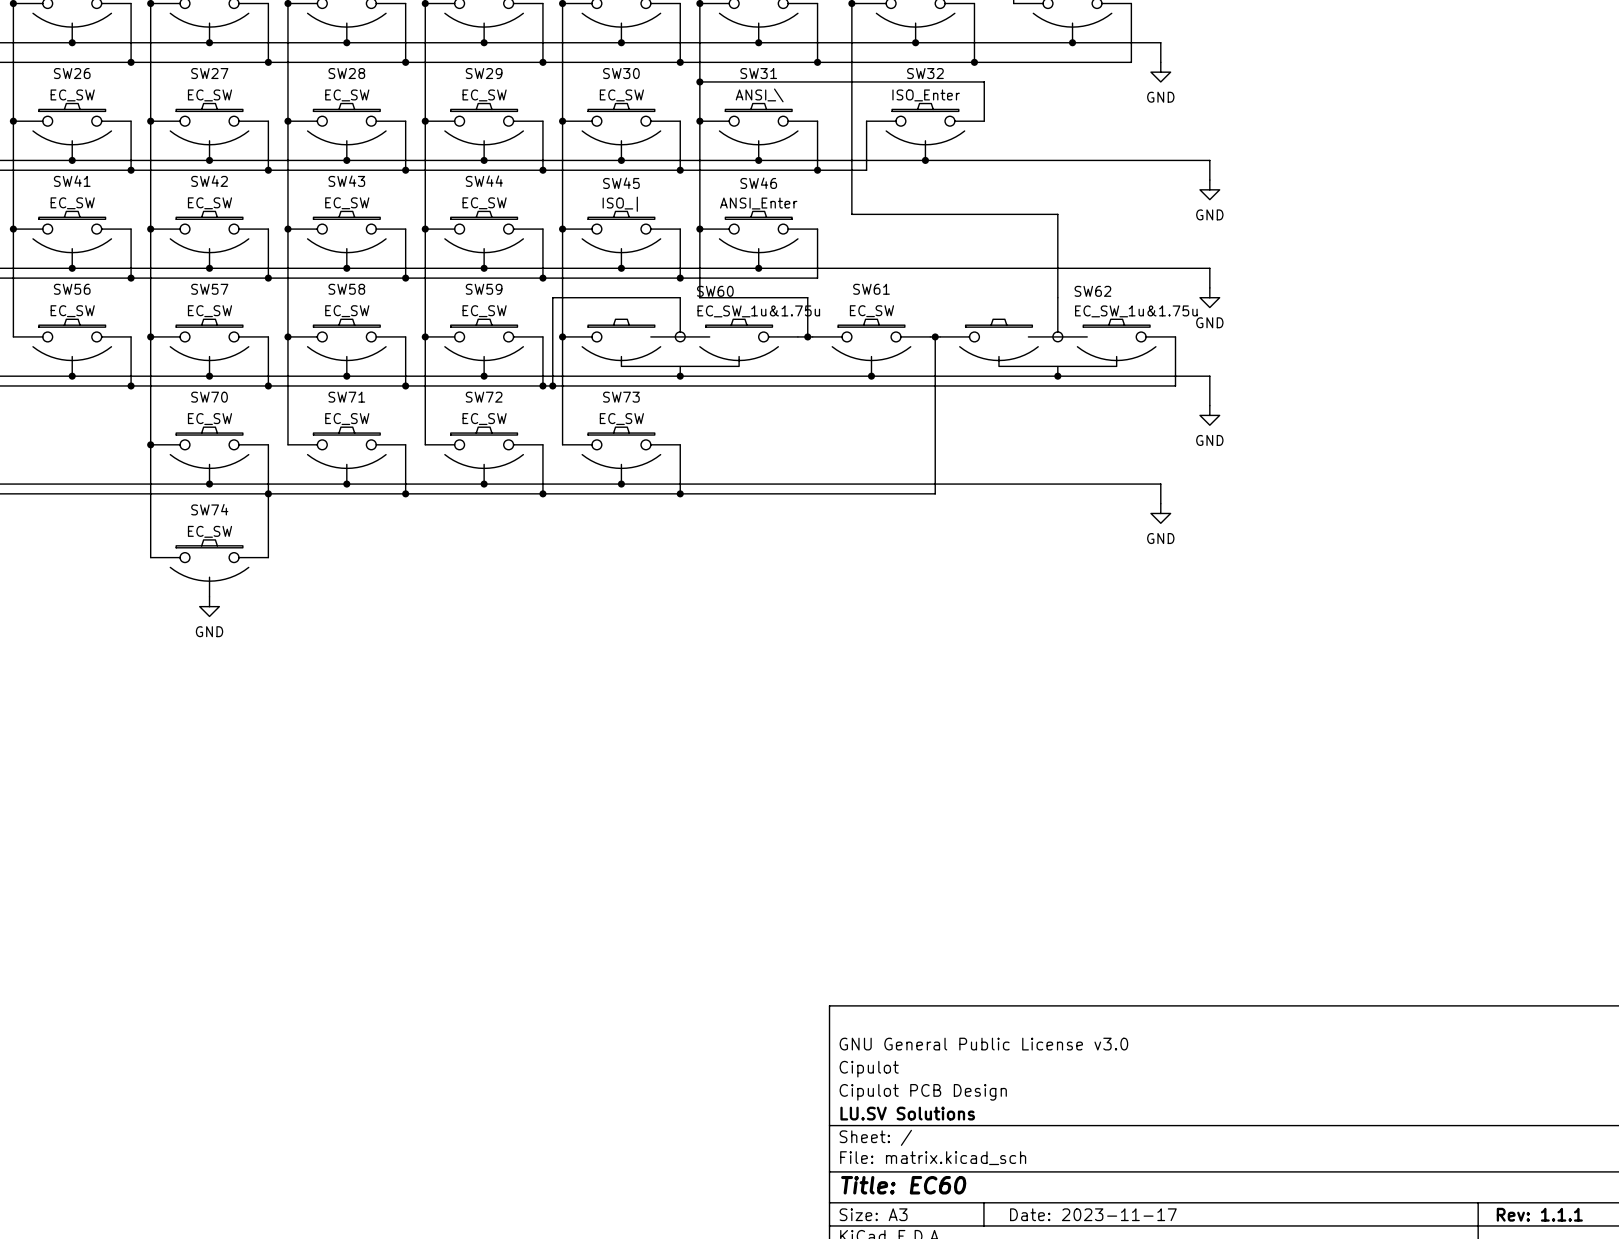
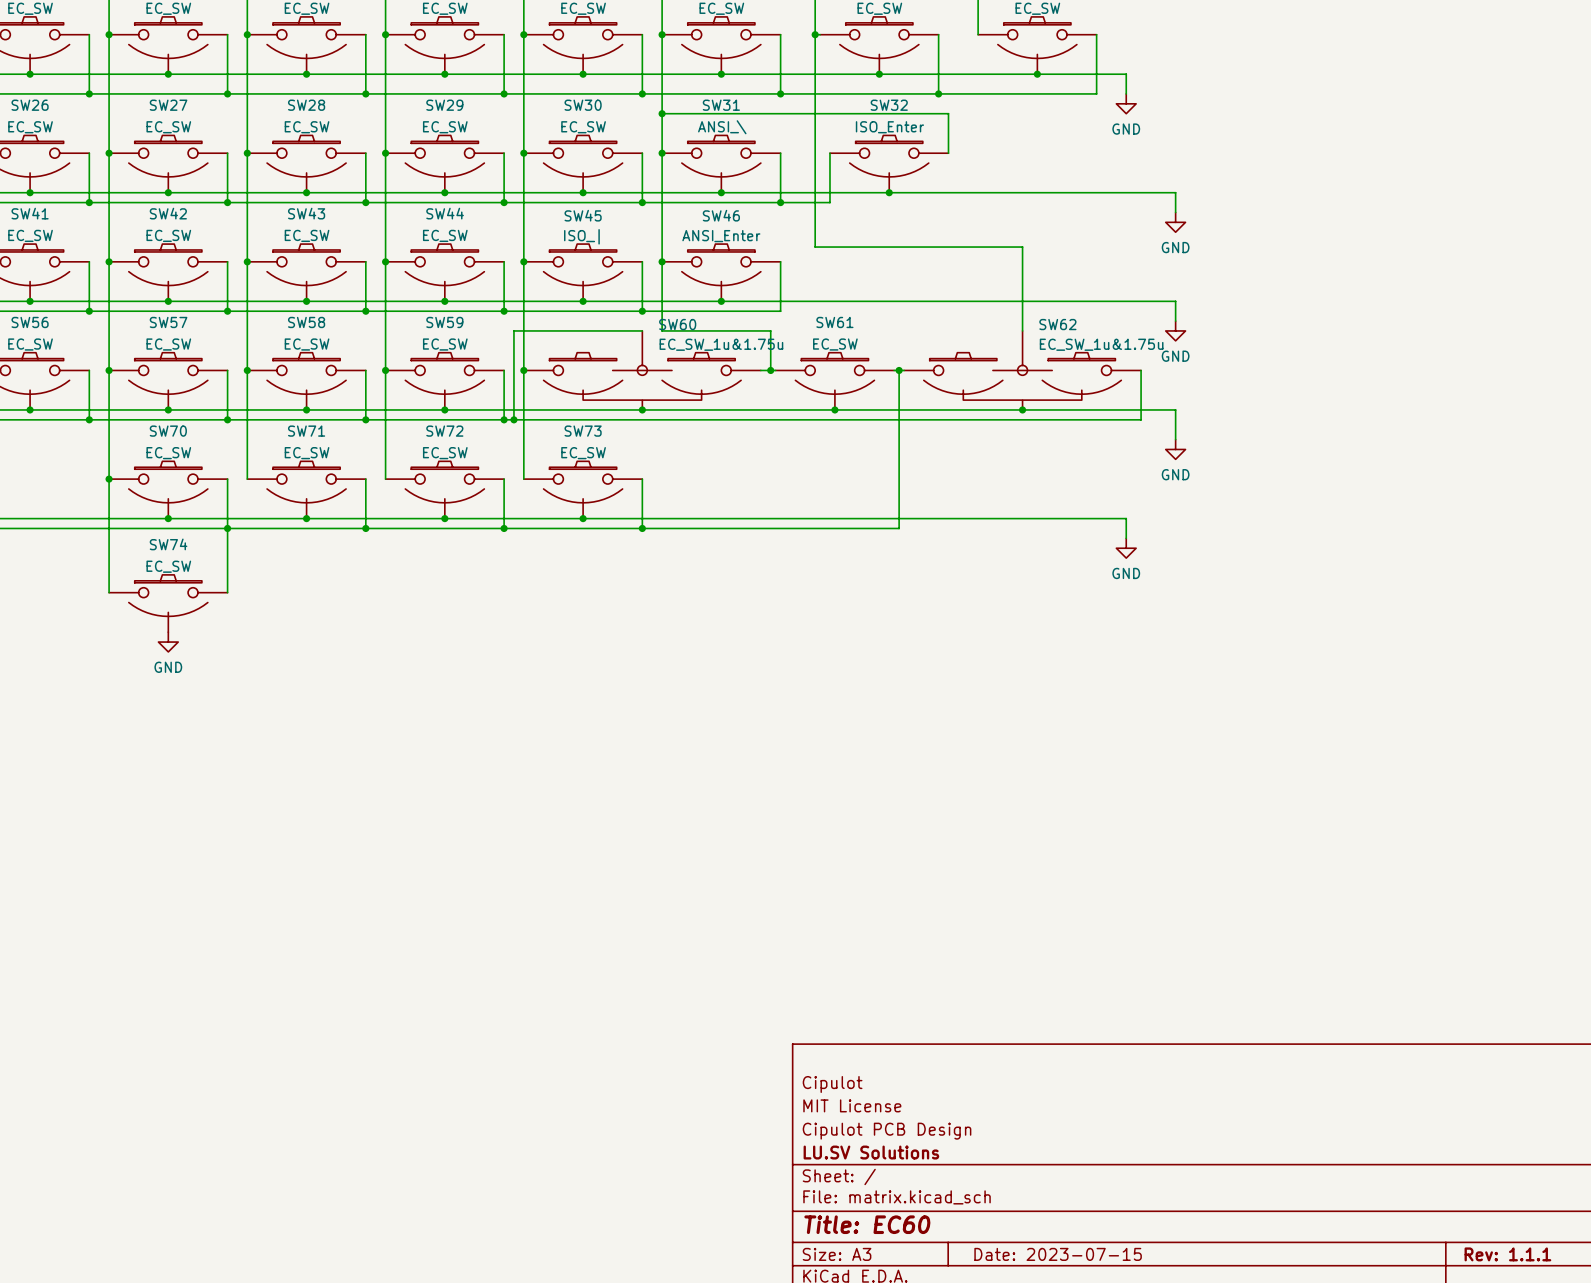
title block: GNU General Public License v3.0 (983, 1044) -> Cipulot (832, 1084)
title block: Cipulot (869, 1069) -> MIT License (852, 1105)
title block: Date: 2023-11-17 (1093, 1214) -> Date: 2023-07-15 (1058, 1254)

